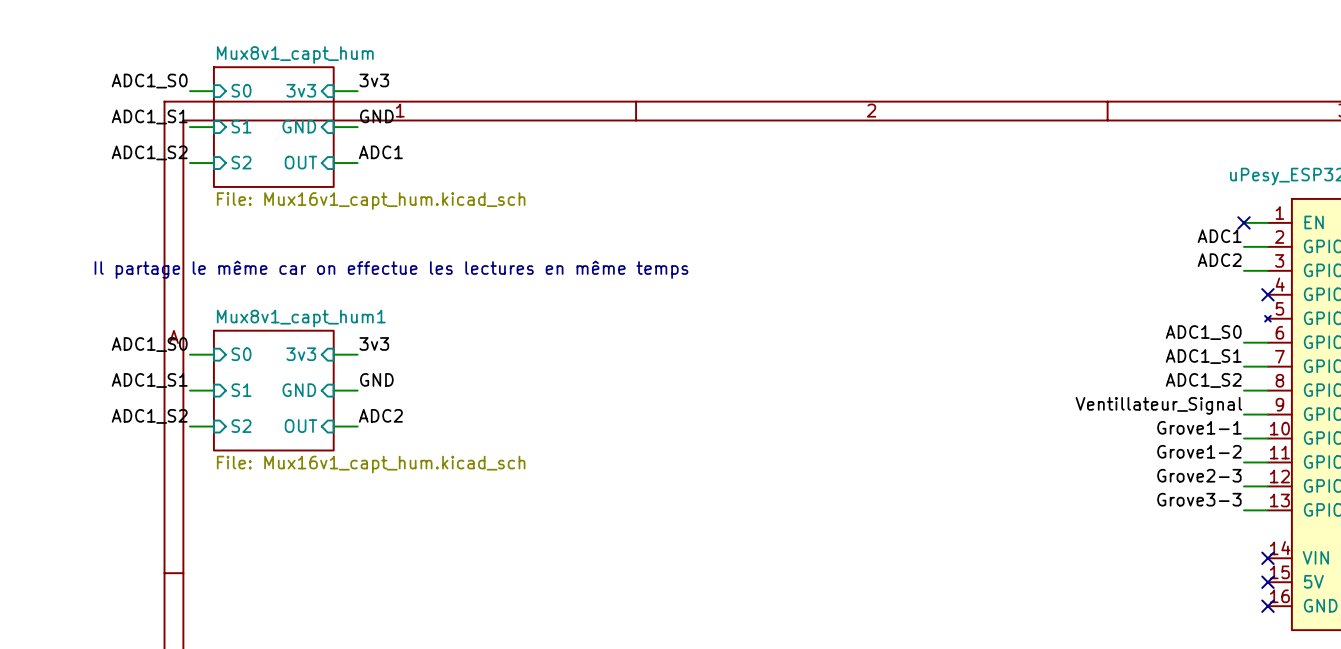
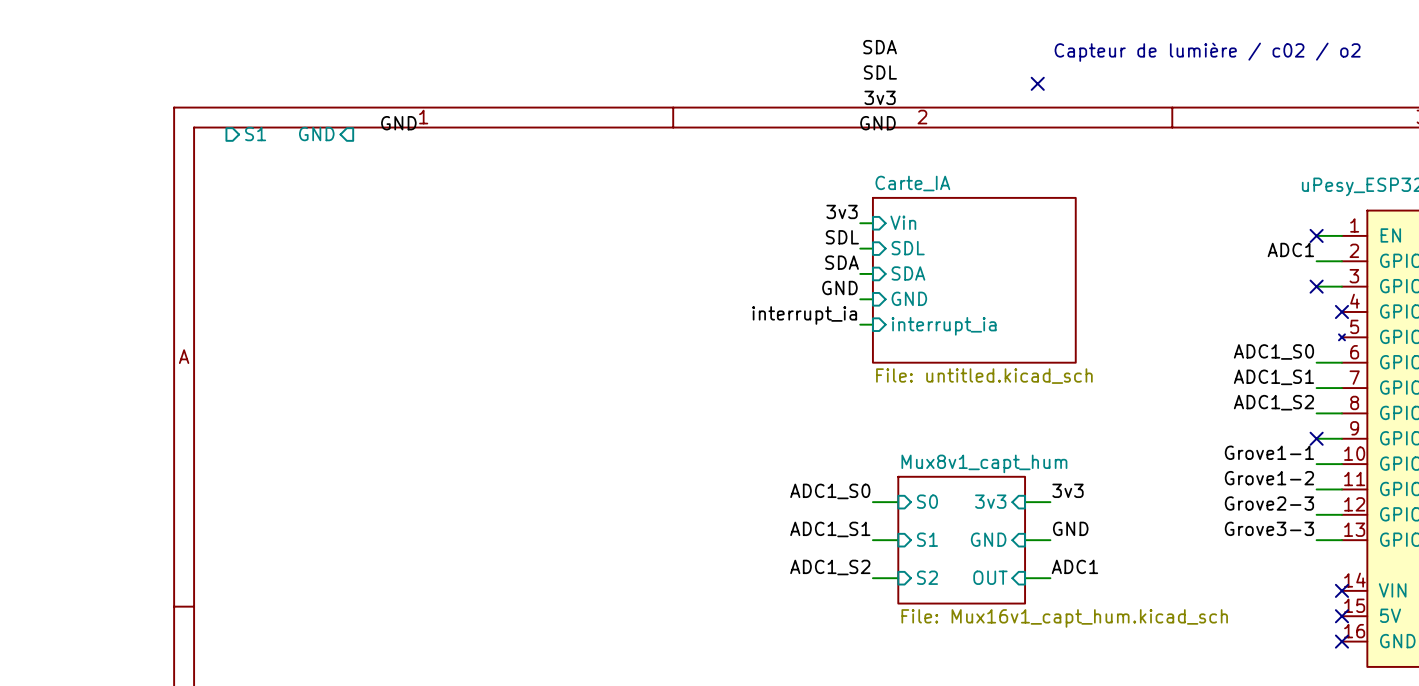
label: none -> SDA (880, 47)
text: none -> Capteur de lumière / c02 / o2 (1207, 52)
label: none -> SDL (880, 72)
no-connect mark: none -> (1037, 83)
label: 3v3 (374, 80) -> none
label: ADC1_S0 (149, 81) -> none
sheet pin: S0 (241, 90) -> none
sheet pin: 3v3 (301, 90) -> none
wire: (189, 91) (213, 91) -> none
wire: (333, 91) (357, 91) -> none
label: none -> 3v3 (880, 97)
label: ADC1_S1 (149, 116) -> none
label: none -> GND (877, 123)
wire: (189, 127) (213, 127) -> none
sheet Mux8v1_capt_hum position: (273, 127) -> (961, 540)
wire: (333, 127) (357, 127) -> none
label: ADC1_S2 (149, 152) -> none
label: ADC1 (380, 152) -> none
sheet pin: S2 (241, 162) -> none
sheet pin: OUT (301, 162) -> none
wire: (189, 163) (213, 163) -> none
wire: (333, 163) (357, 163) -> none
label: none -> 3v3 (842, 211)
wire: none -> (860, 223) (872, 223)
sheet pin: none -> Vin (903, 222)
label: none -> SDL (842, 237)
wire: none -> (860, 248) (872, 248)
sheet pin: none -> SDL (908, 248)
label: none -> SDA (842, 262)
wire: none -> (860, 273) (872, 273)
sheet pin: none -> SDA (908, 273)
label: ADC2 (1219, 260) -> none
sheet Carte_IA: none -> File: untitled.kicad_sch (974, 280)
text: Il partage le même car on effectue les lectures en même temps (391, 269) -> none
no-connect mark: none -> (1316, 286)
label: none -> GND (839, 288)
wire: none -> (860, 299) (872, 299)
sheet pin: none -> GND (909, 298)
label: none -> interrupt_ia (804, 315)
wire: none -> (860, 324) (872, 324)
sheet pin: none -> interrupt_ia (944, 326)
label: 3v3 (374, 343) -> none
label: ADC1_S0 (149, 344) -> none
wire: (189, 354) (213, 354) -> none
sheet pin: S0 (241, 354) -> none
sheet pin: 3v3 (301, 354) -> none
wire: (333, 354) (357, 354) -> none
label: GND (376, 379) -> none
label: ADC1_S1 (149, 380) -> none
wire: (189, 390) (213, 390) -> none
sheet pin: S1 (241, 390) -> none
sheet Mux8v1_capt_hum1: File: Mux16v1_capt_hum.kicad_sch (273, 390) -> none
sheet pin: GND (299, 390) -> none
wire: (333, 390) (357, 390) -> none
label: Ventillateur_Signal (1158, 405) -> none
no-connect mark: none -> (1316, 438)
label: ADC2 (380, 415) -> none
label: ADC1_S2 (149, 416) -> none
wire: (189, 426) (213, 426) -> none
sheet pin: S2 (241, 426) -> none
sheet pin: OUT (301, 426) -> none
wire: (333, 426) (357, 426) -> none
label: none -> 3v3 (1068, 490)
label: none -> ADC1_S0 (830, 491)
sheet pin: none -> S0 (927, 501)
sheet pin: none -> 3v3 (990, 501)
wire: none -> (872, 502) (898, 502)
wire: none -> (1025, 502) (1050, 502)
label: none -> GND (1070, 528)
label: none -> ADC1_S1 (830, 529)
sheet pin: none -> S1 (927, 539)
sheet pin: none -> GND (988, 539)
wire: none -> (872, 540) (898, 540)
wire: none -> (1025, 540) (1050, 540)
label: none -> ADC1 (1074, 566)
label: none -> ADC1_S2 (830, 567)
sheet pin: none -> S2 (927, 577)
sheet pin: none -> OUT (990, 577)
wire: none -> (872, 578) (898, 578)
wire: none -> (1025, 578) (1050, 578)

